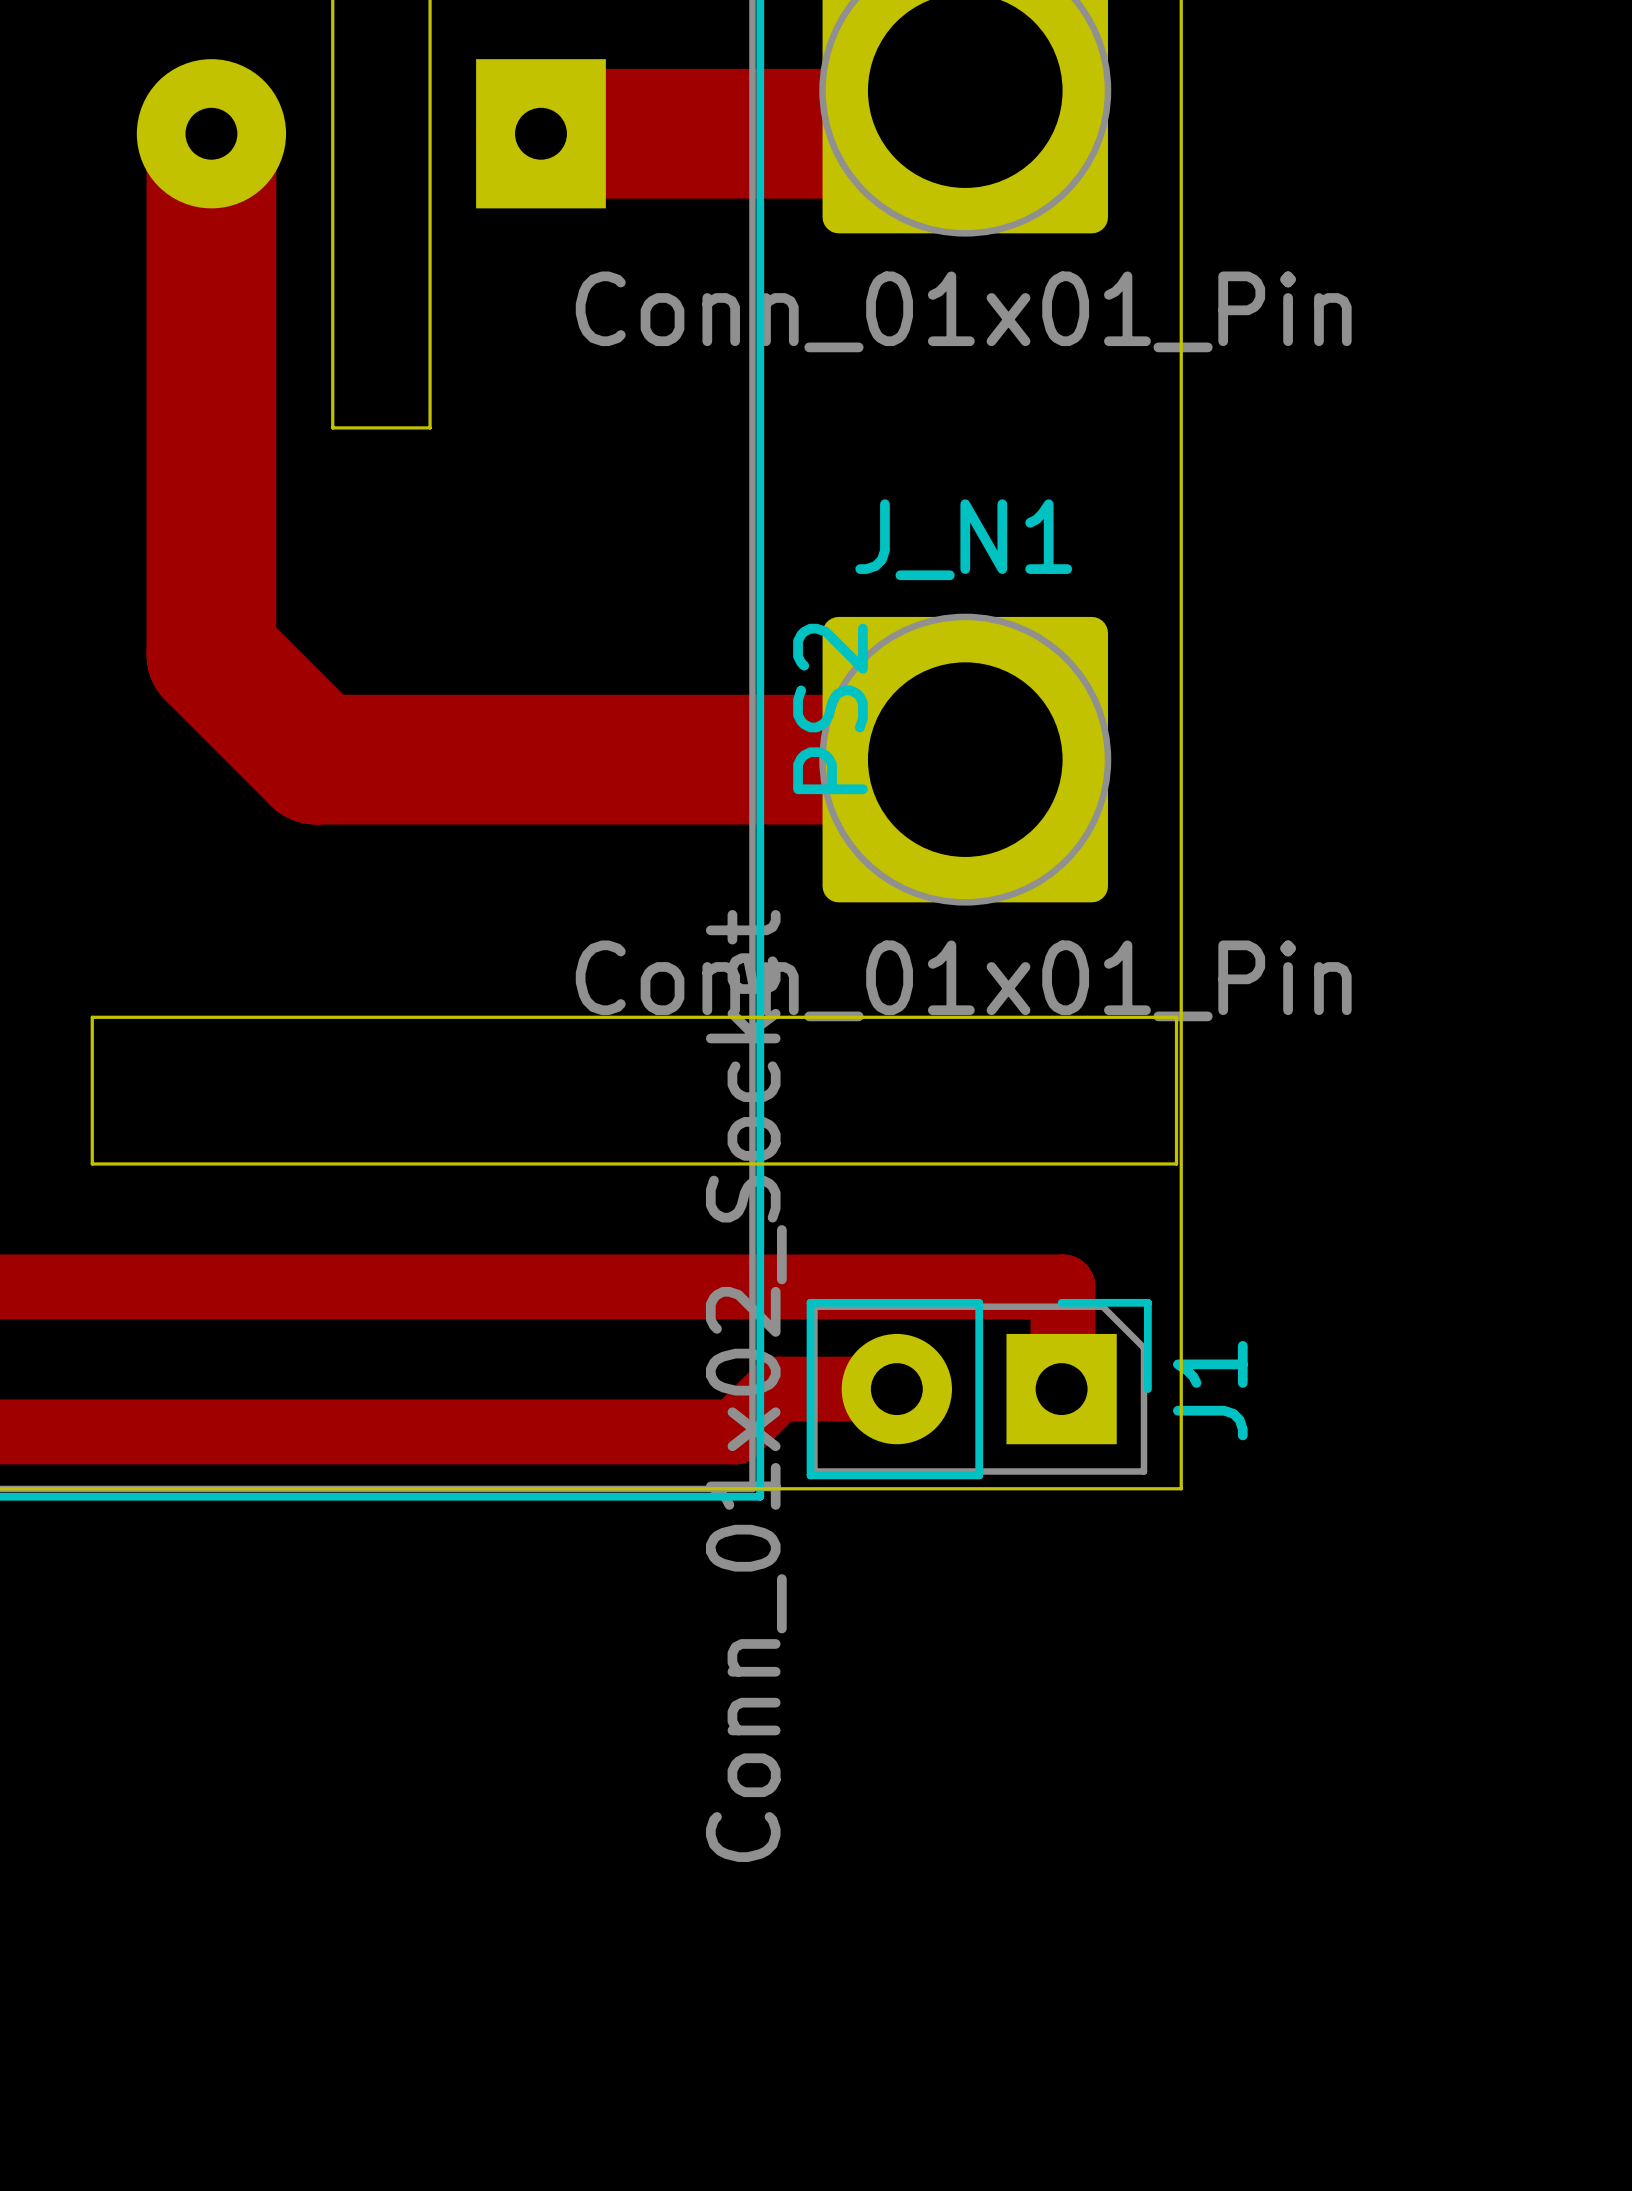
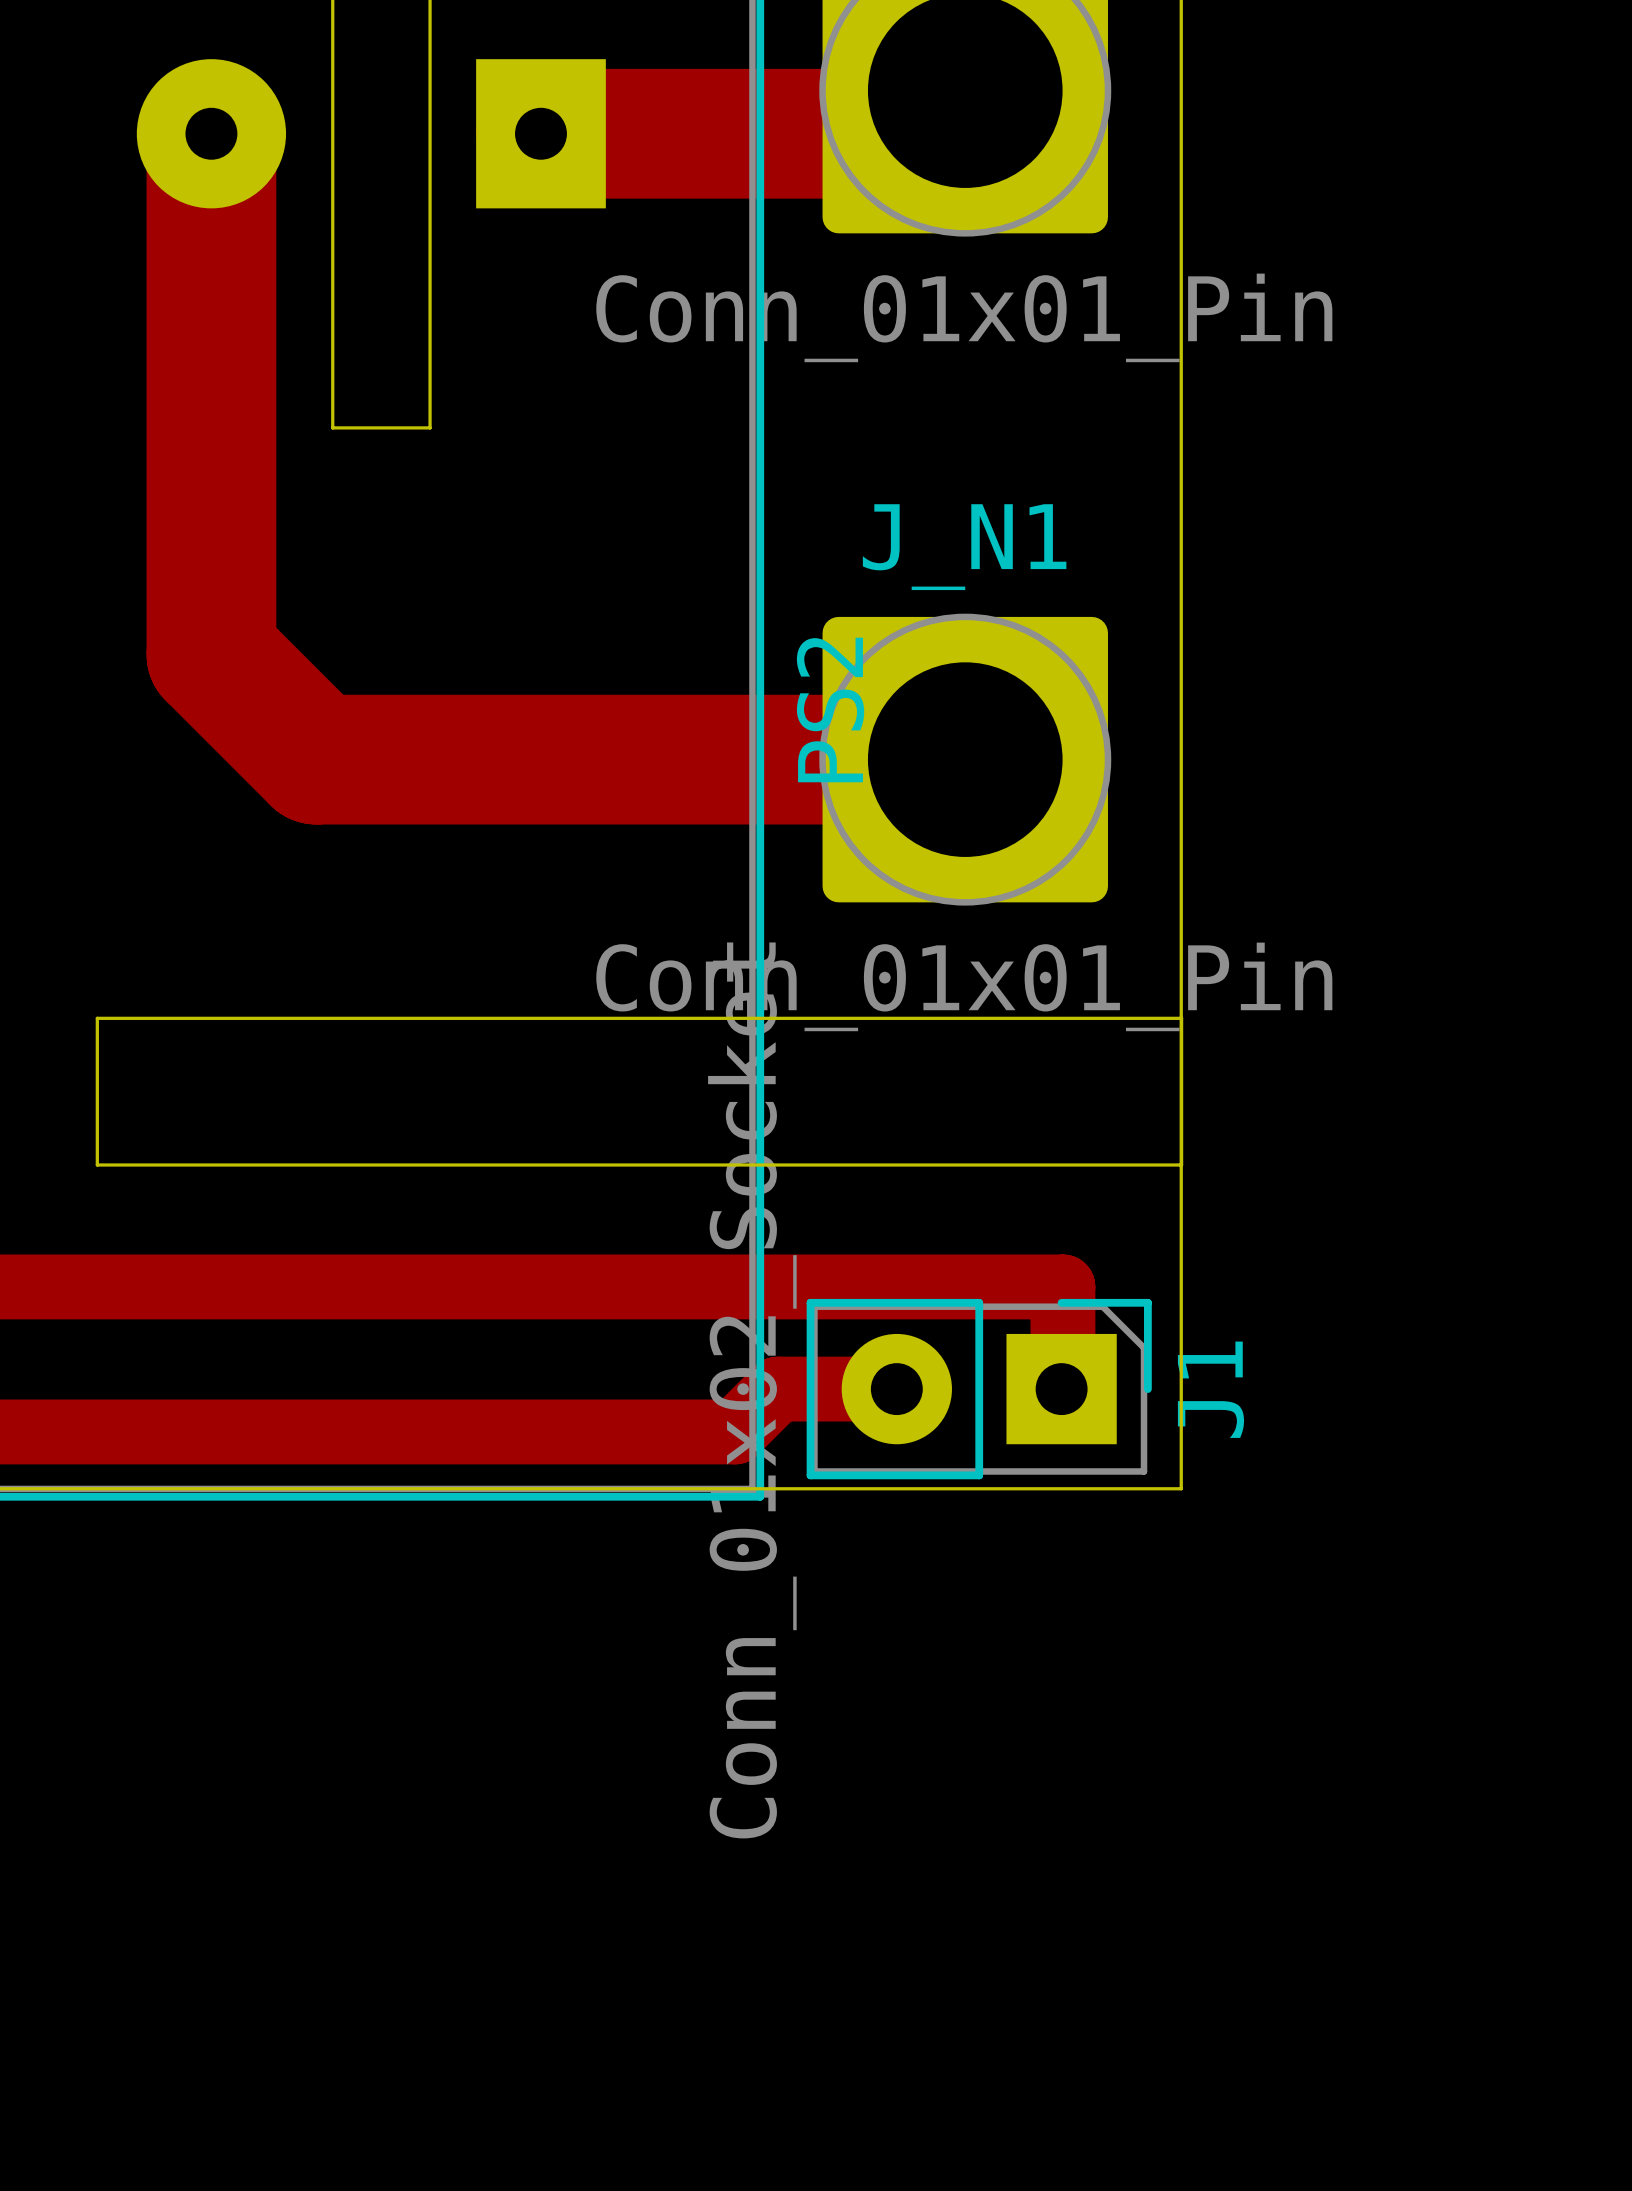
board edge: (92, 1017) (1176, 1017) (1176, 1163) (92, 1163) (92, 1017) -> none
board edge: none -> (1181, 1018) (97, 1018) (97, 1164) (1181, 1164)

